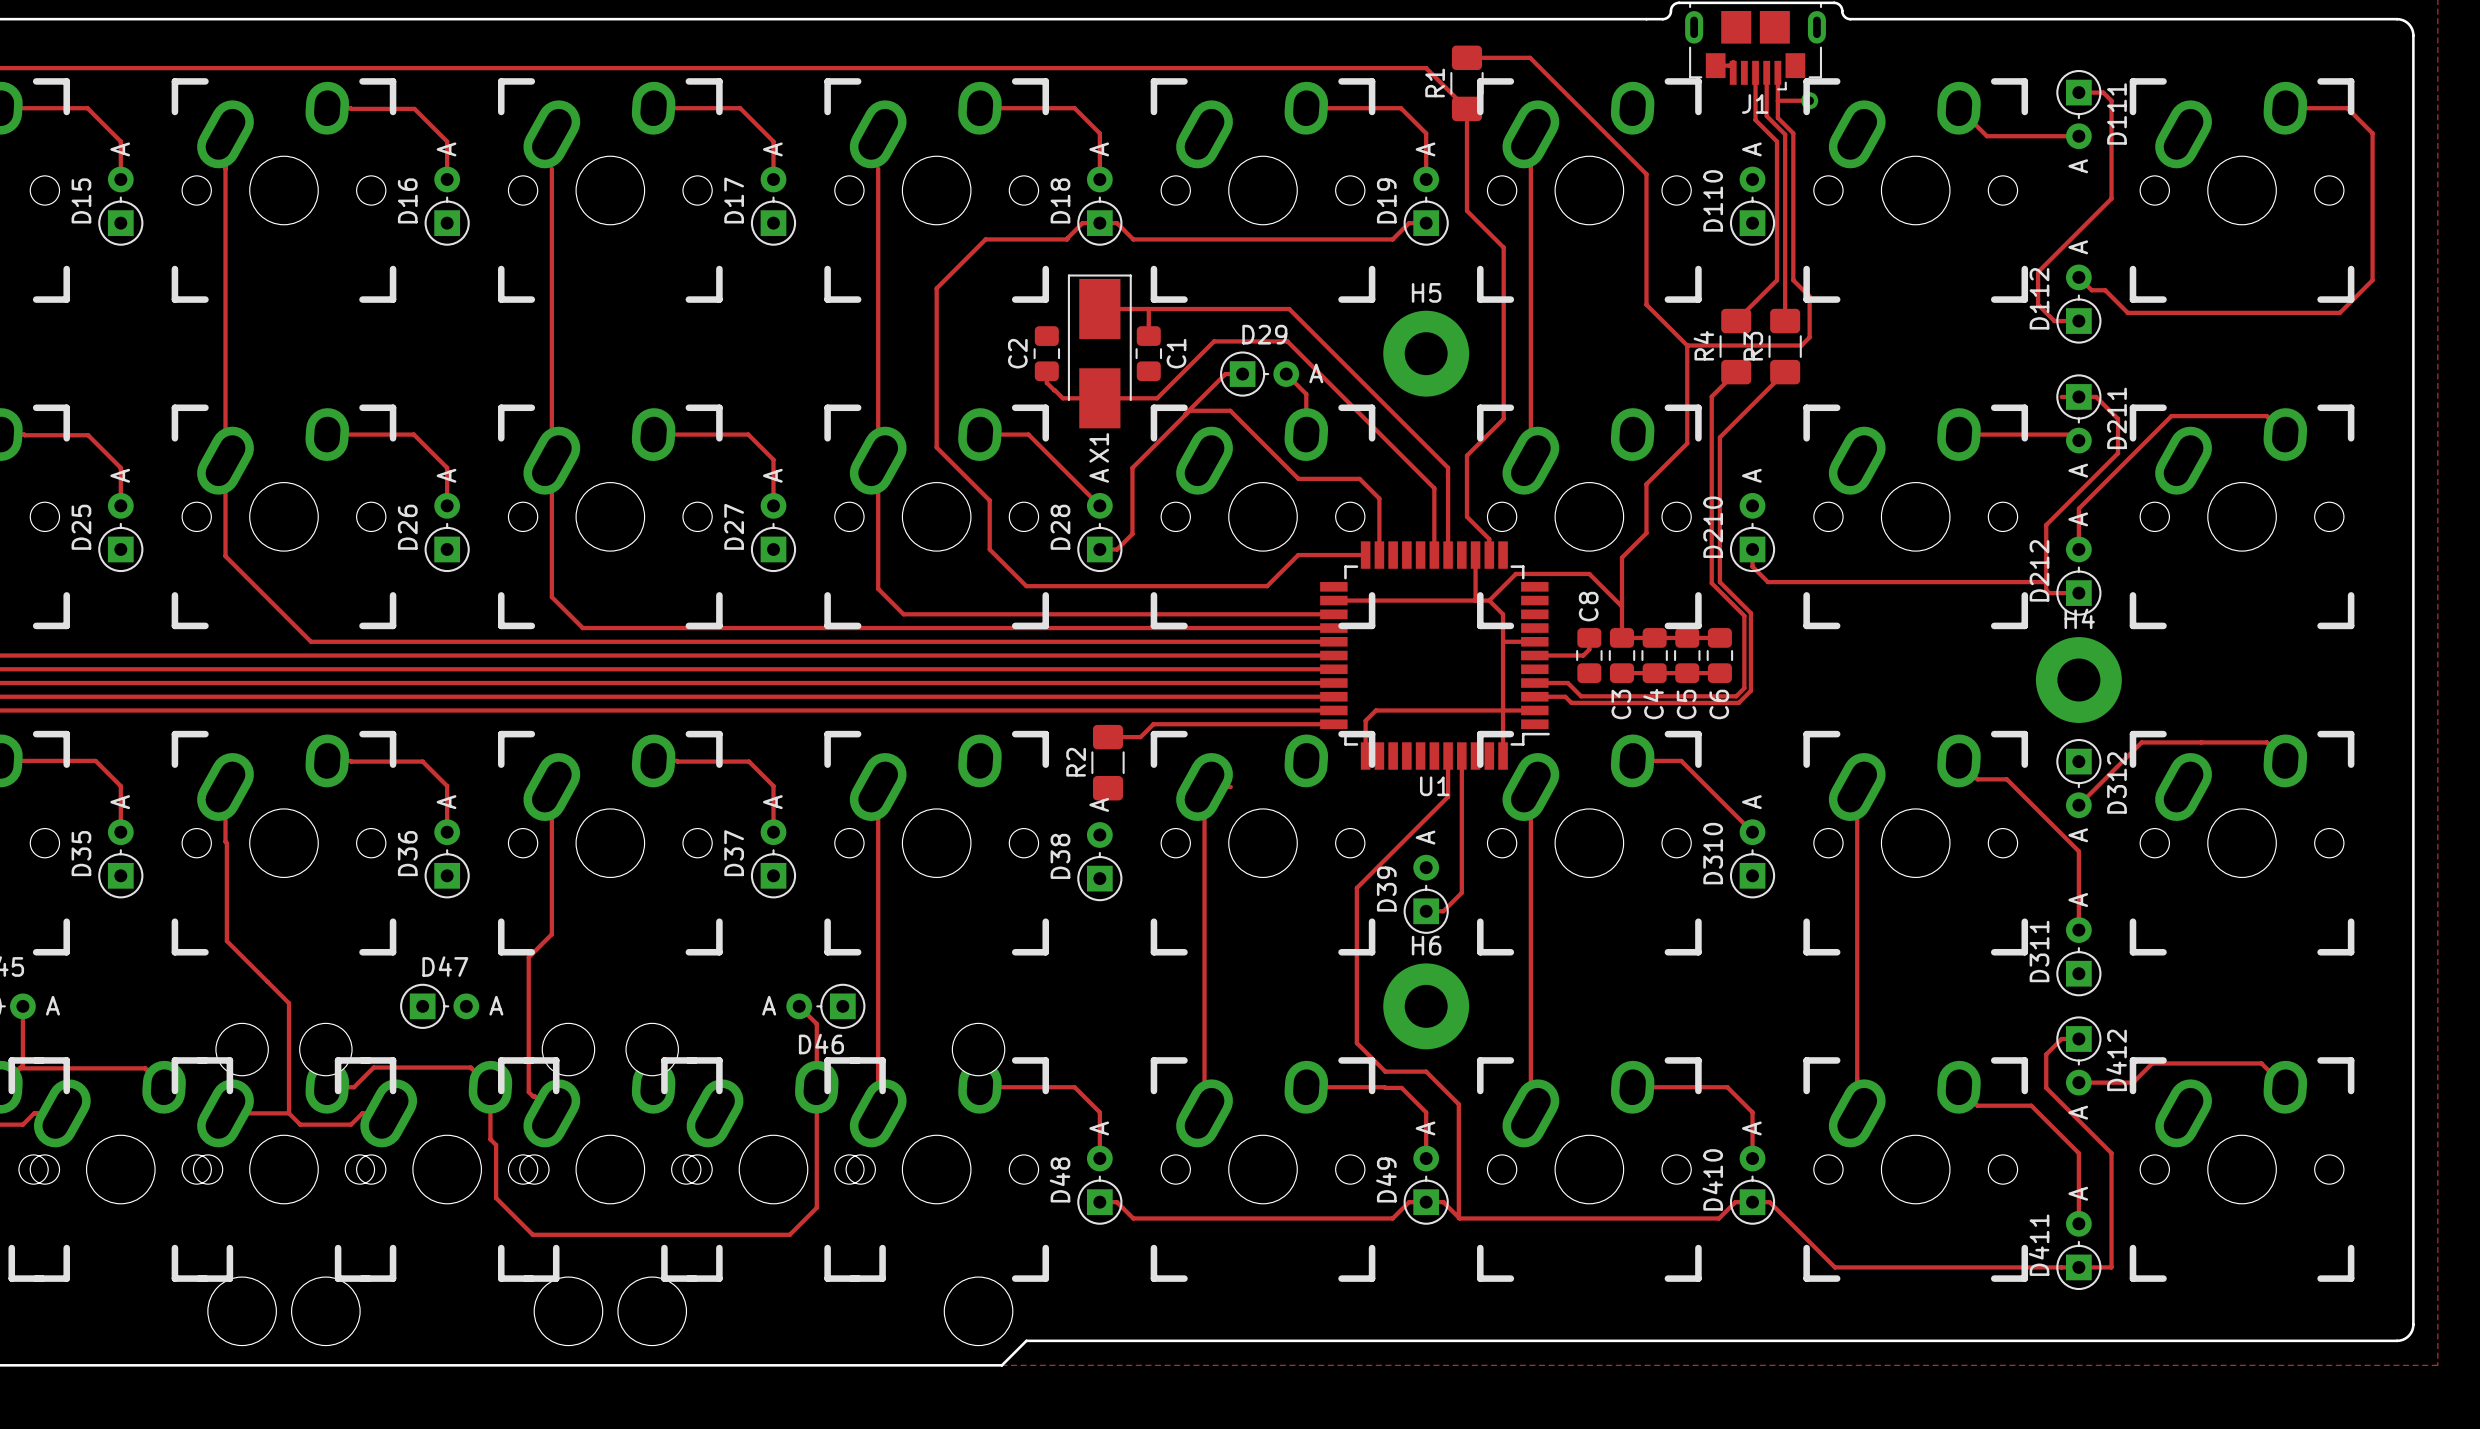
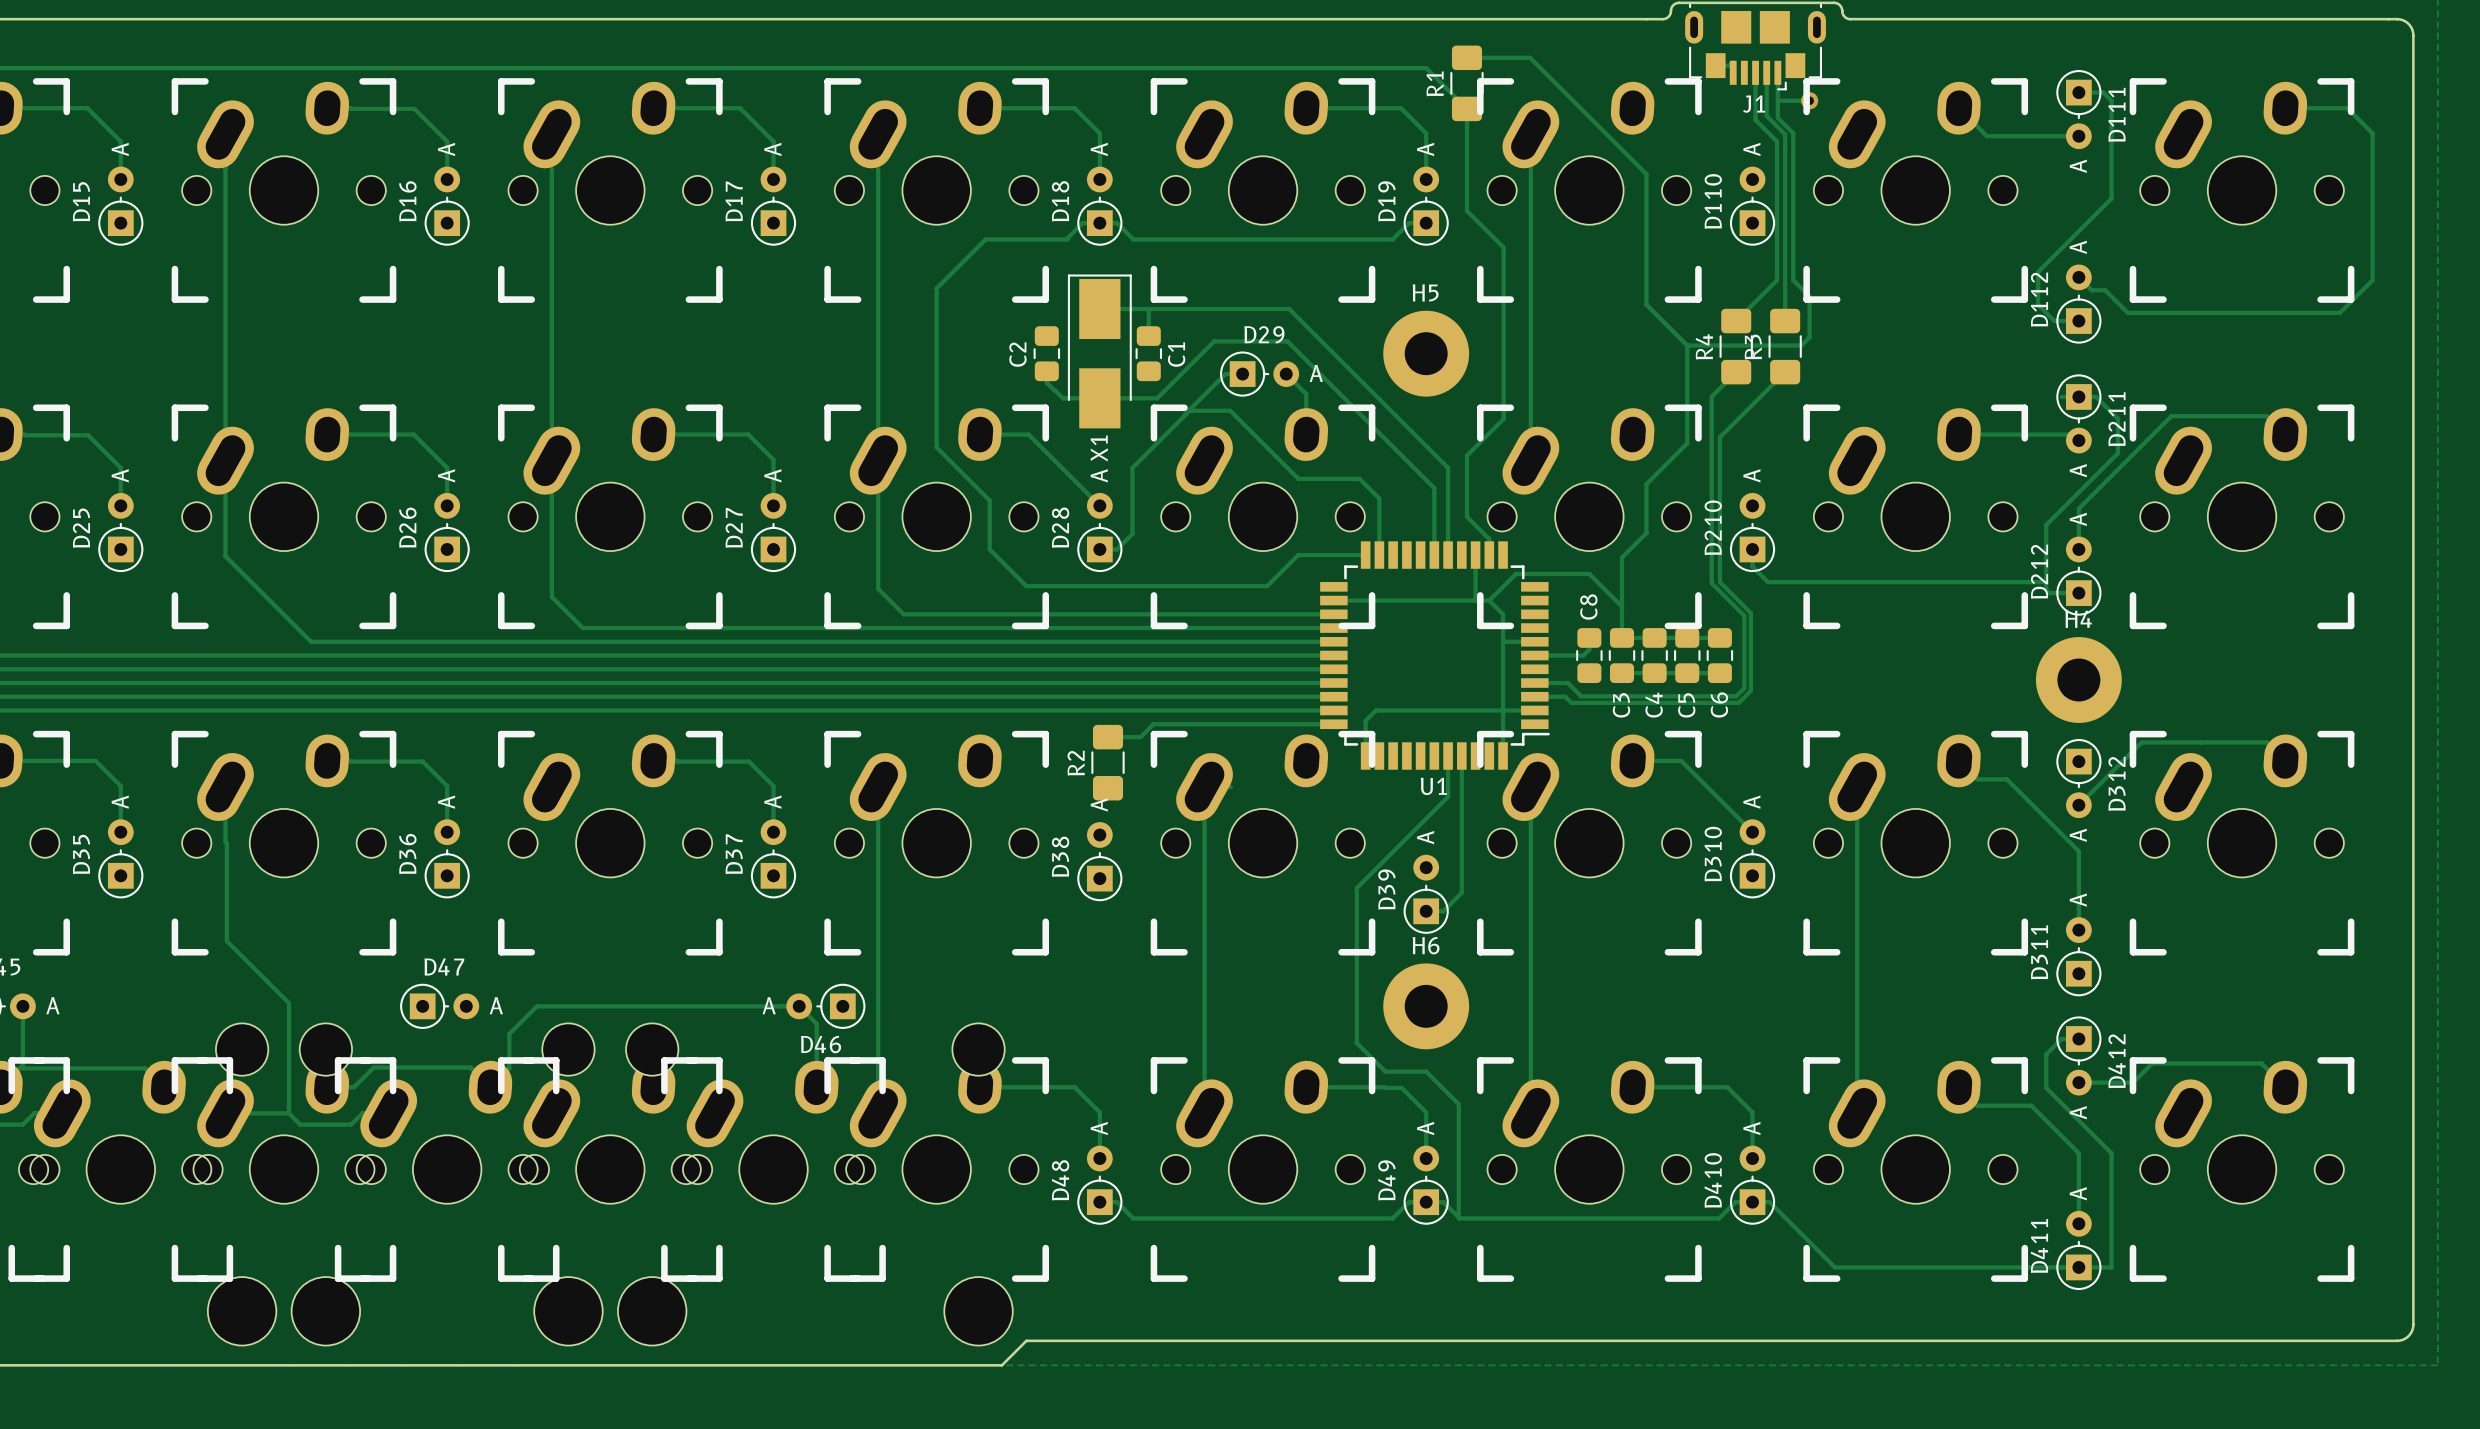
track: (551, 787) (551, 934) (528, 957) (528, 1092) (551, 1113) -> none
track: (490, 1087) (490, 1139) (496, 1145) (496, 1198) (532, 1234) (789, 1234) (816, 1207) (816, 1087) -> (490, 1087) (509, 1068) (509, 1033) (536, 1006) (799, 1006)

